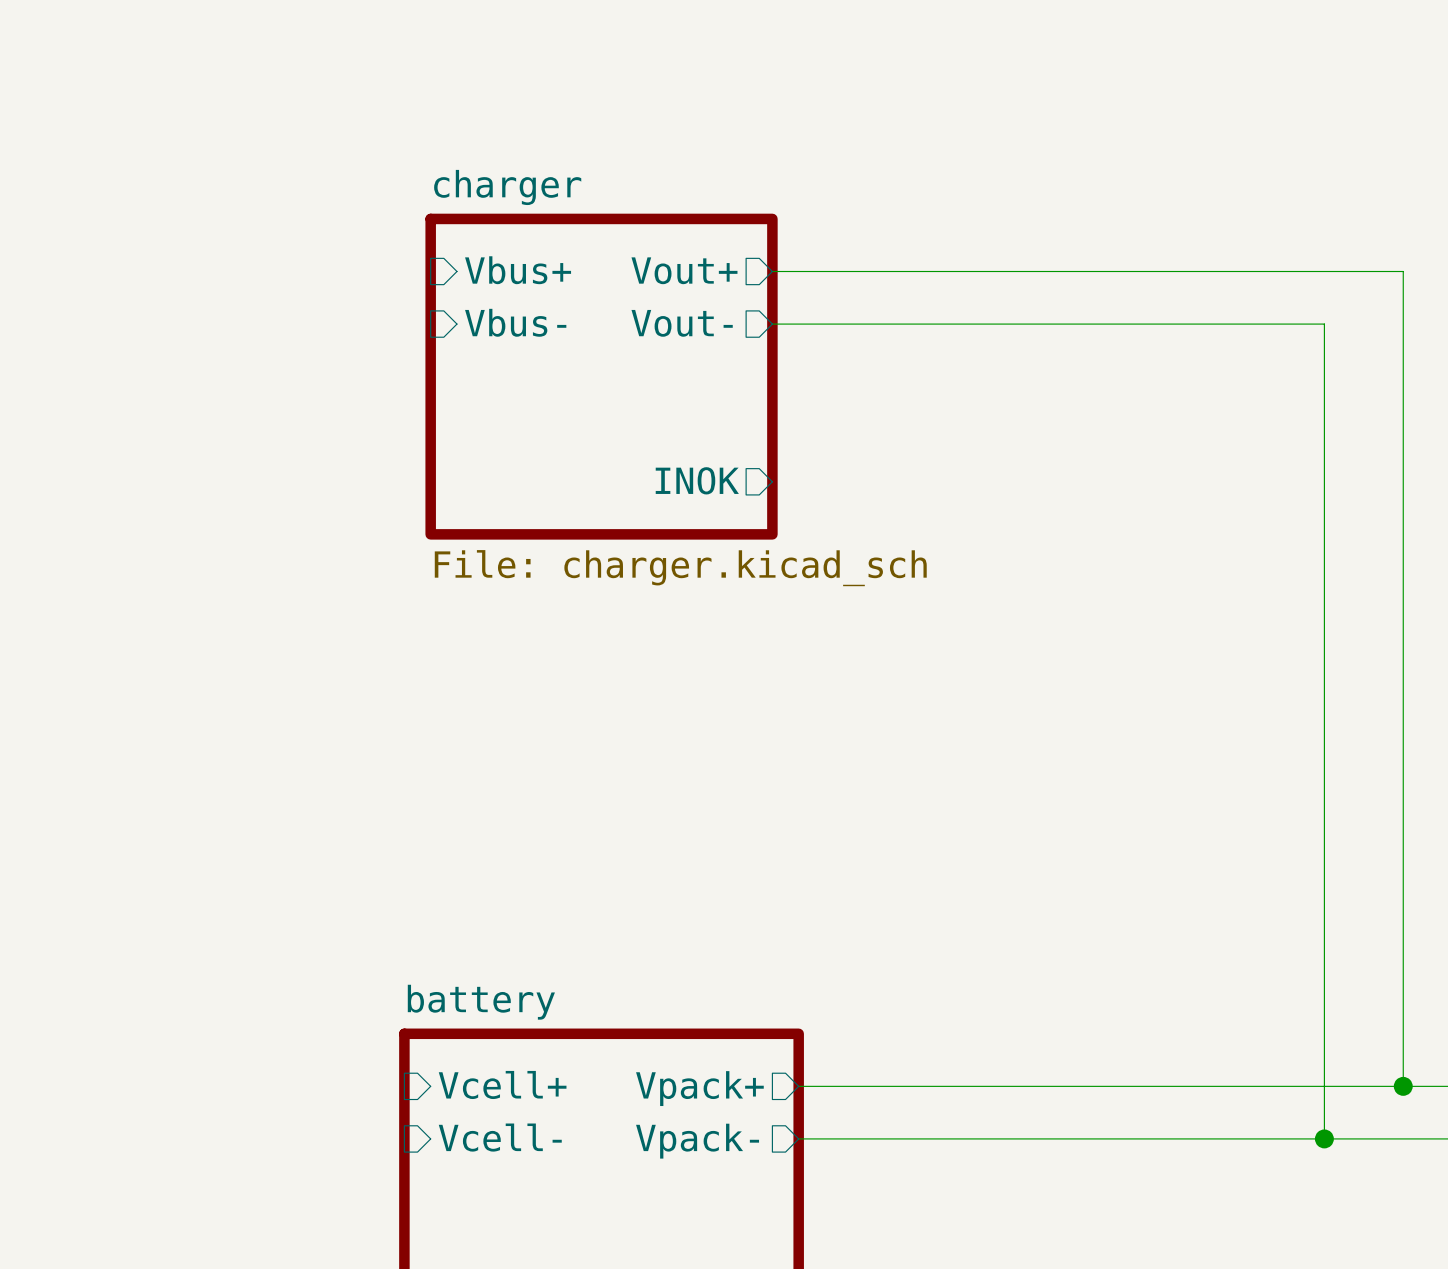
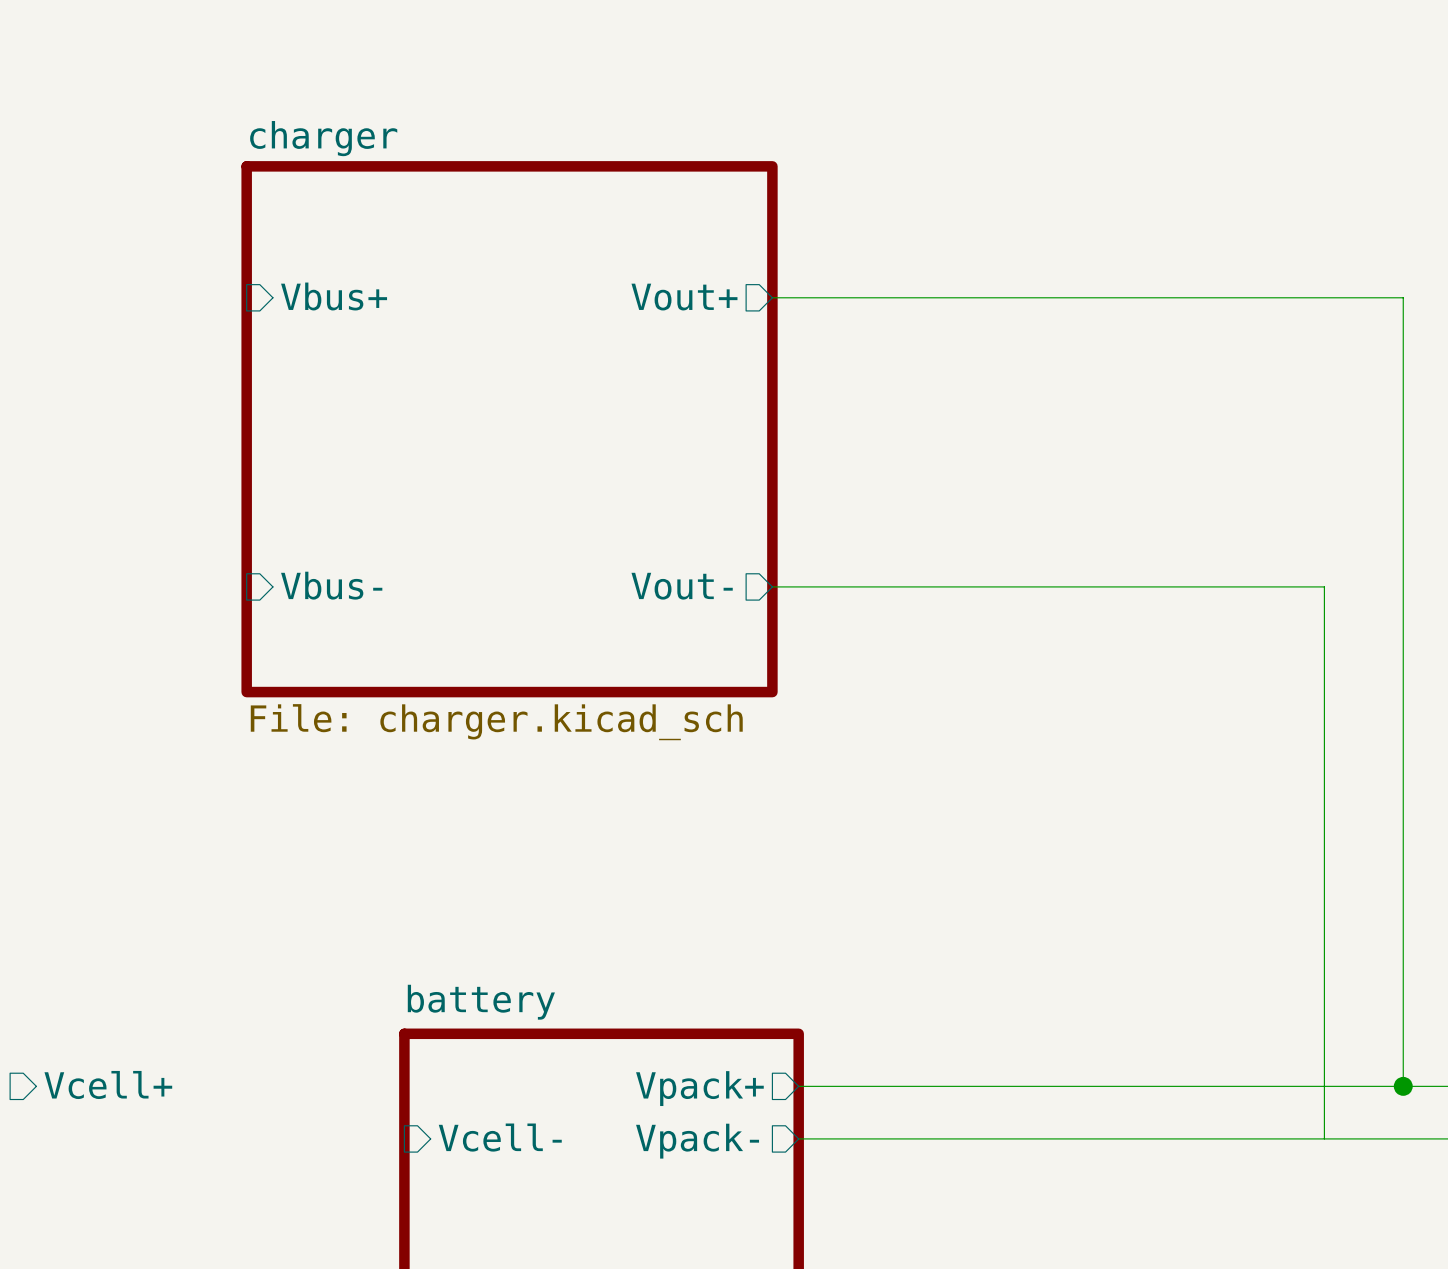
sheet pin position: Vbus+ (518, 270) -> Vbus+ (334, 296)
sheet pin position: Vout+ (684, 270) -> Vout+ (684, 297)
wire: (772, 271) (1403, 271) (1403, 297) -> (772, 297) (1403, 297)
sheet pin position: Vbus- (515, 322) -> Vbus- (331, 585)
sheet pin position: Vout- (682, 323) -> Vout- (682, 586)
wire: (772, 324) (1324, 324) (1324, 586) -> (772, 586) (1324, 586)
sheet charger: File: charger.kicad_sch (601, 376) -> none
sheet charger: none -> File: charger.kicad_sch (509, 429)
sheet pin: INOK (697, 480) -> none
sheet pin position: Vcell+ (502, 1084) -> Vcell+ (108, 1084)
junction: (1324, 1138) -> none

